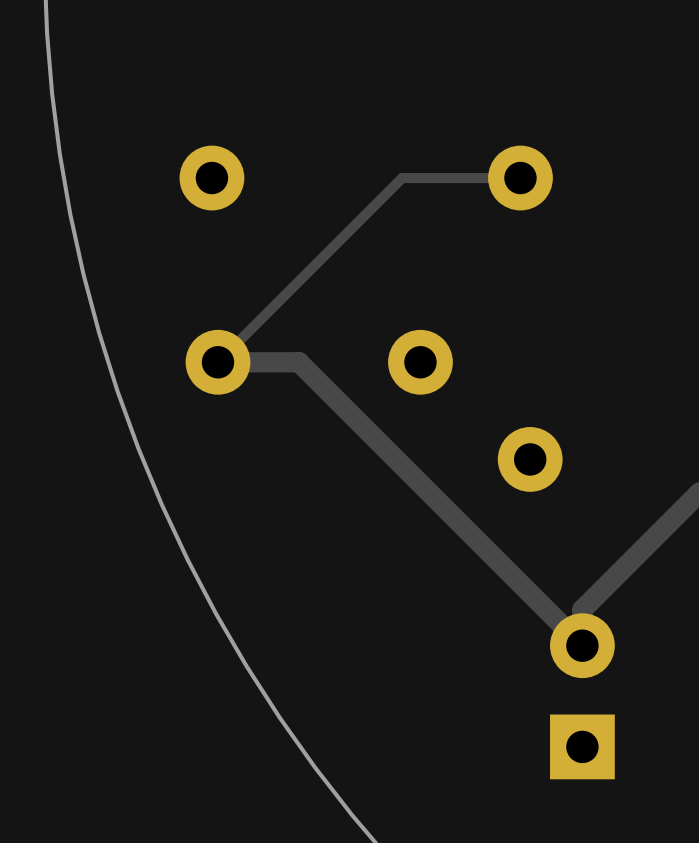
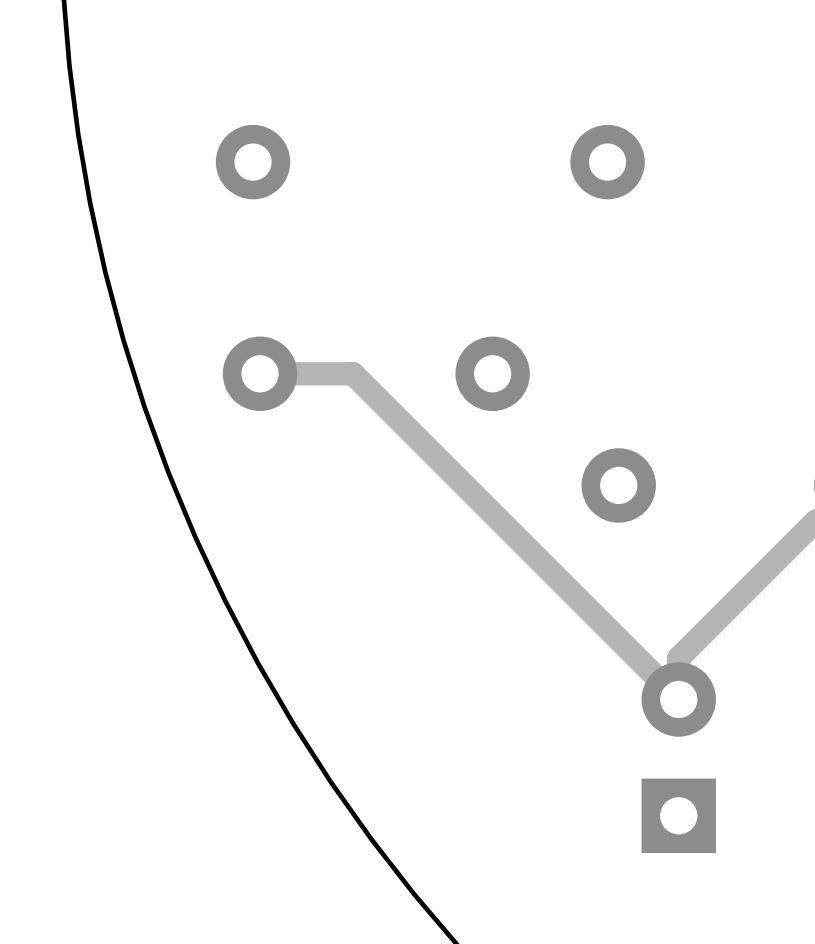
track: (520, 178) (402, 178) (218, 362) -> none

